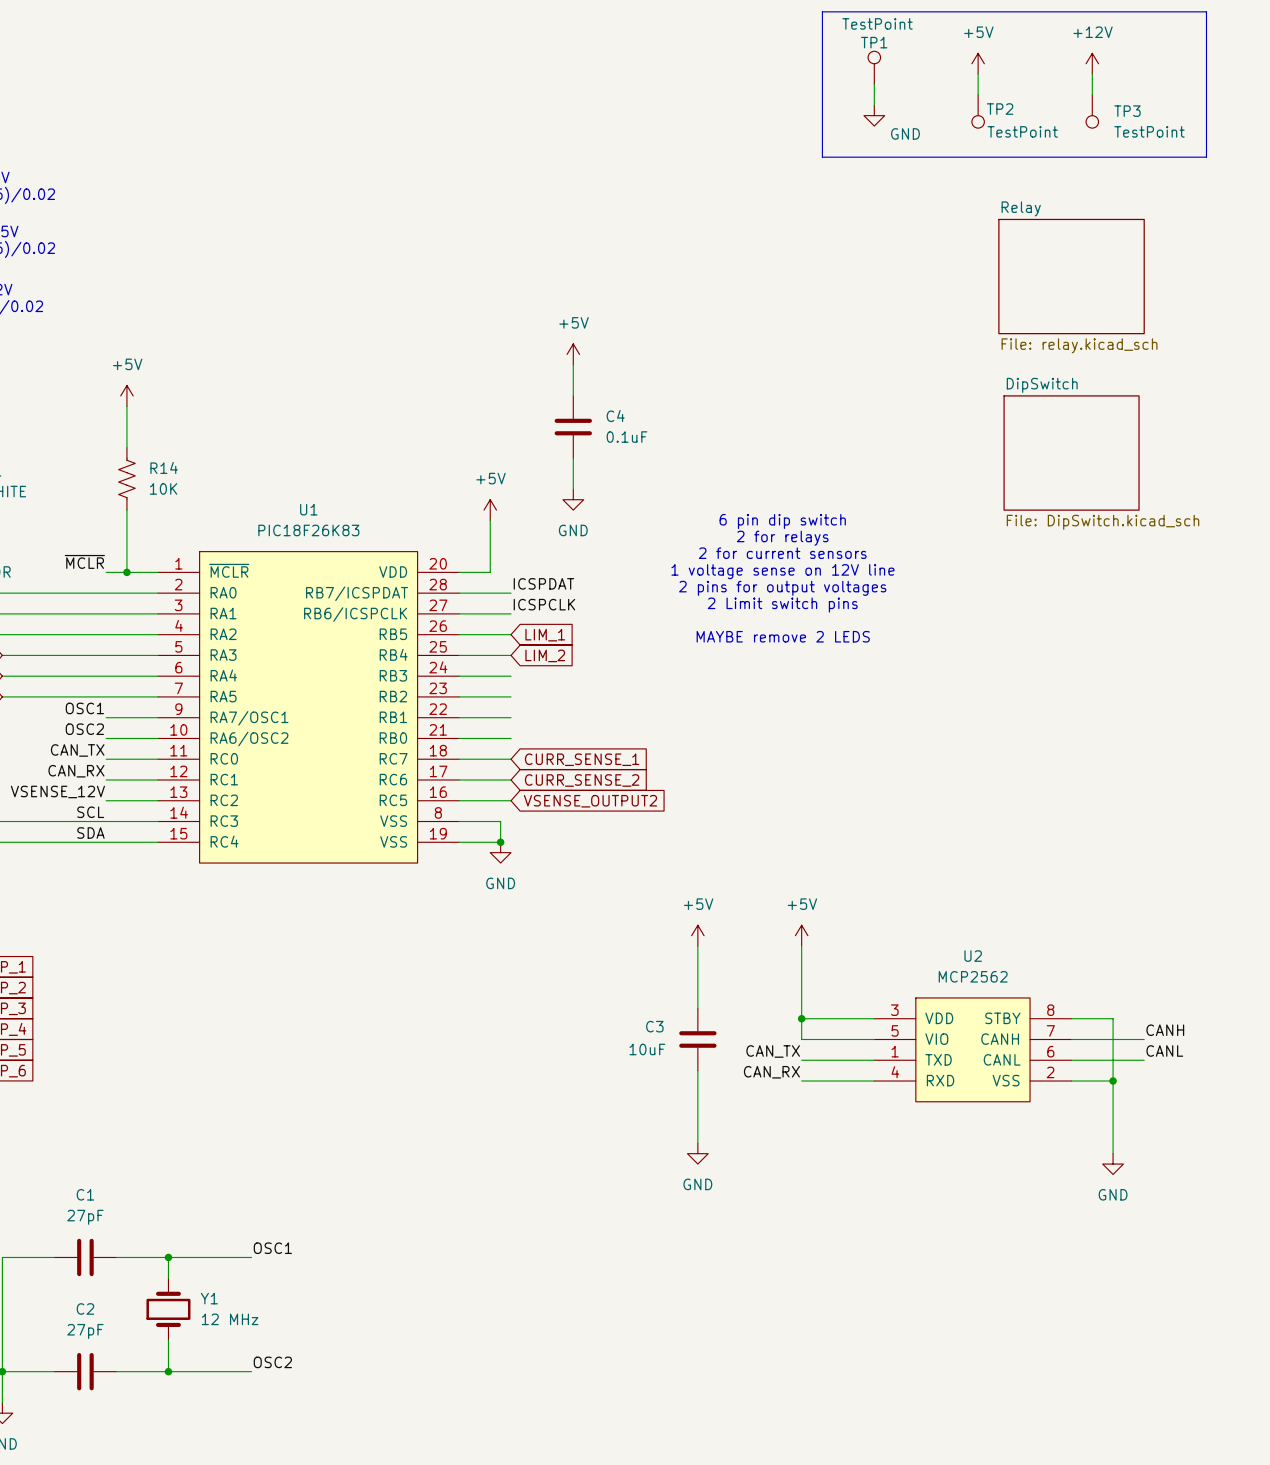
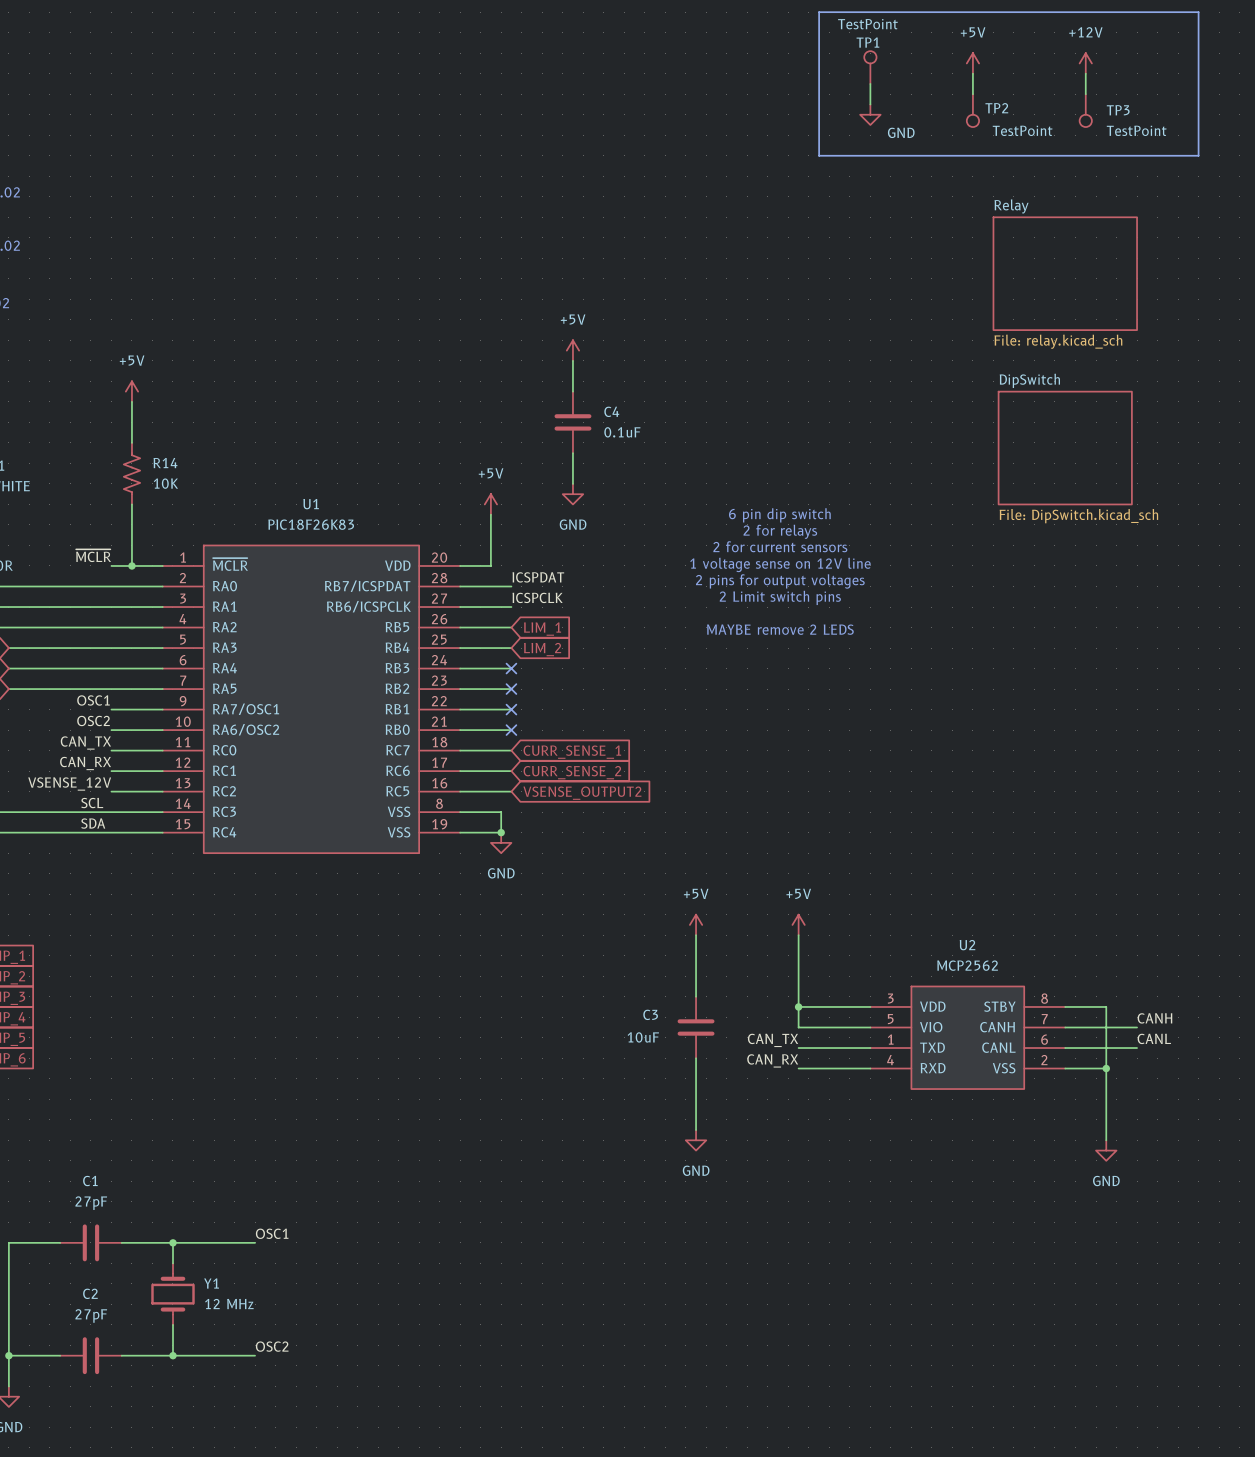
no-connect mark: none -> (511, 668)
no-connect mark: none -> (511, 689)
no-connect mark: none -> (511, 709)
no-connect mark: none -> (511, 730)

